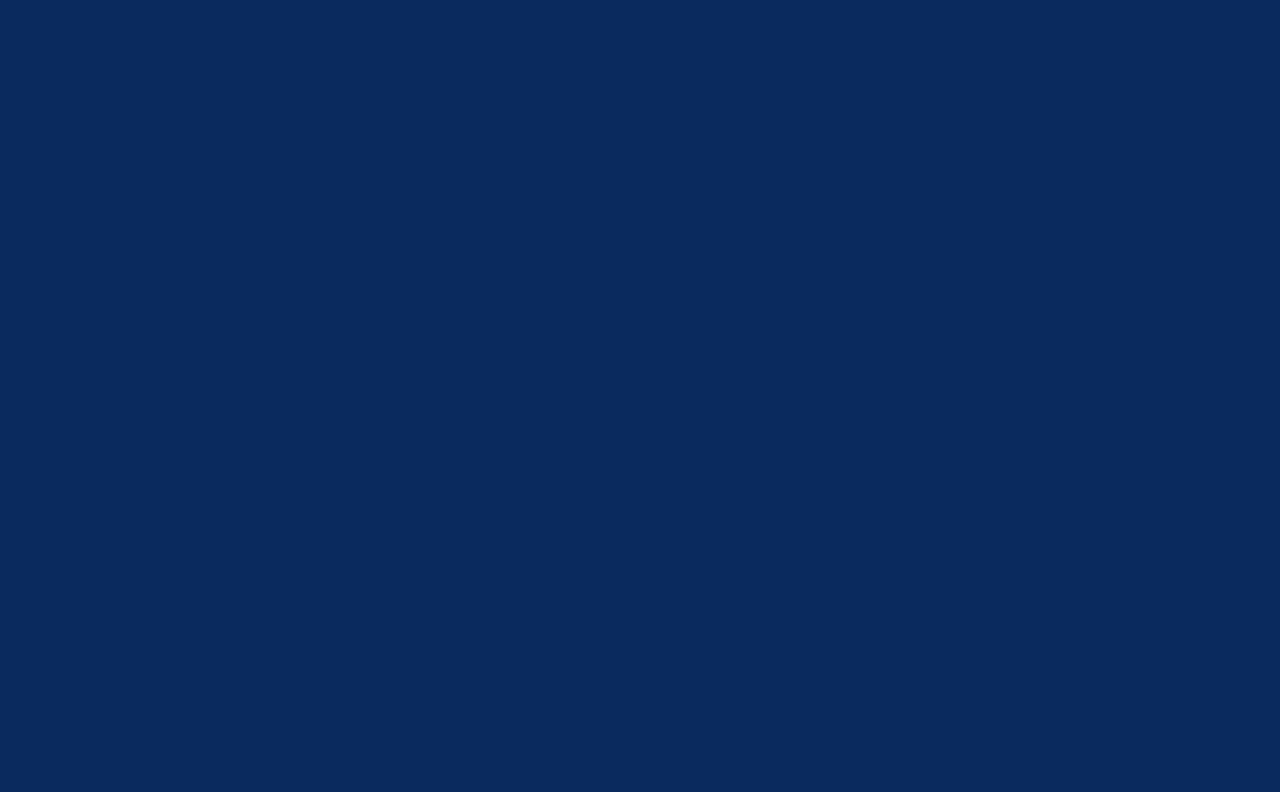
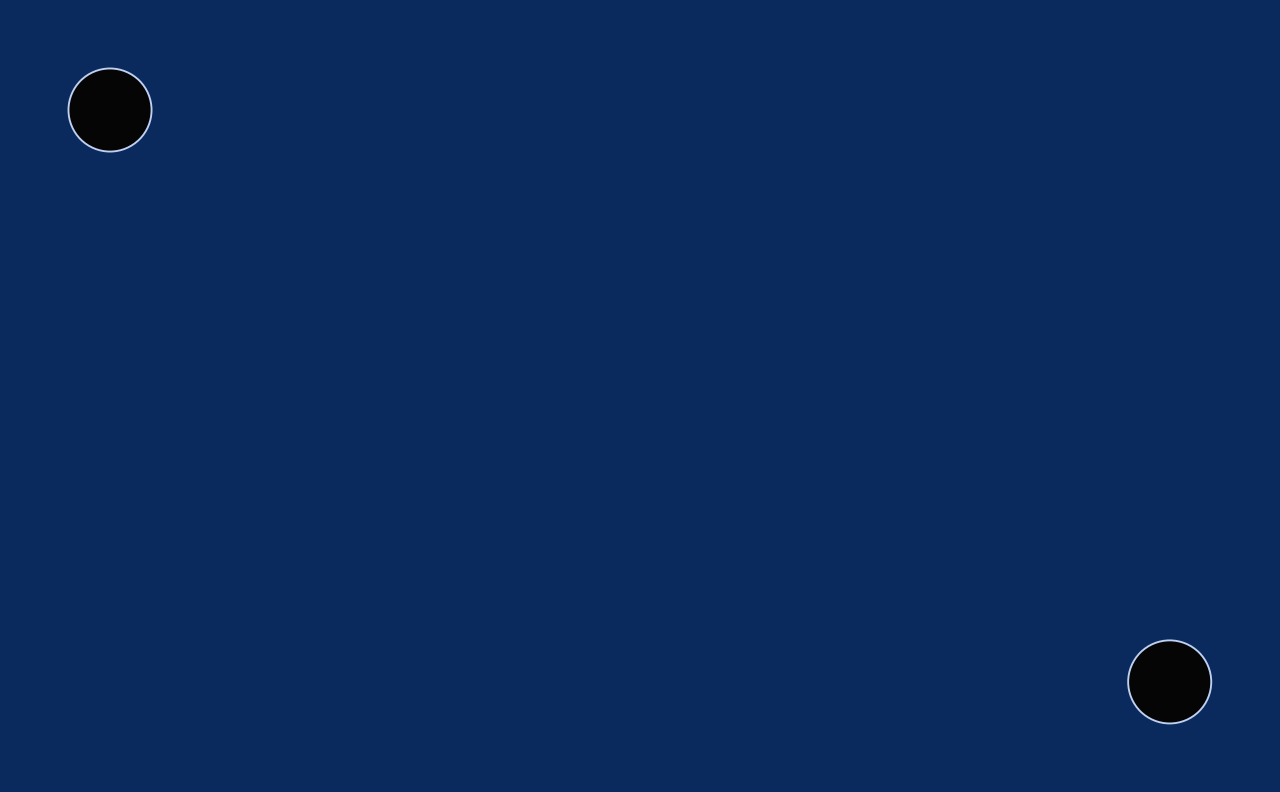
part: none -> (110, 110)
part: none -> (1169, 681)

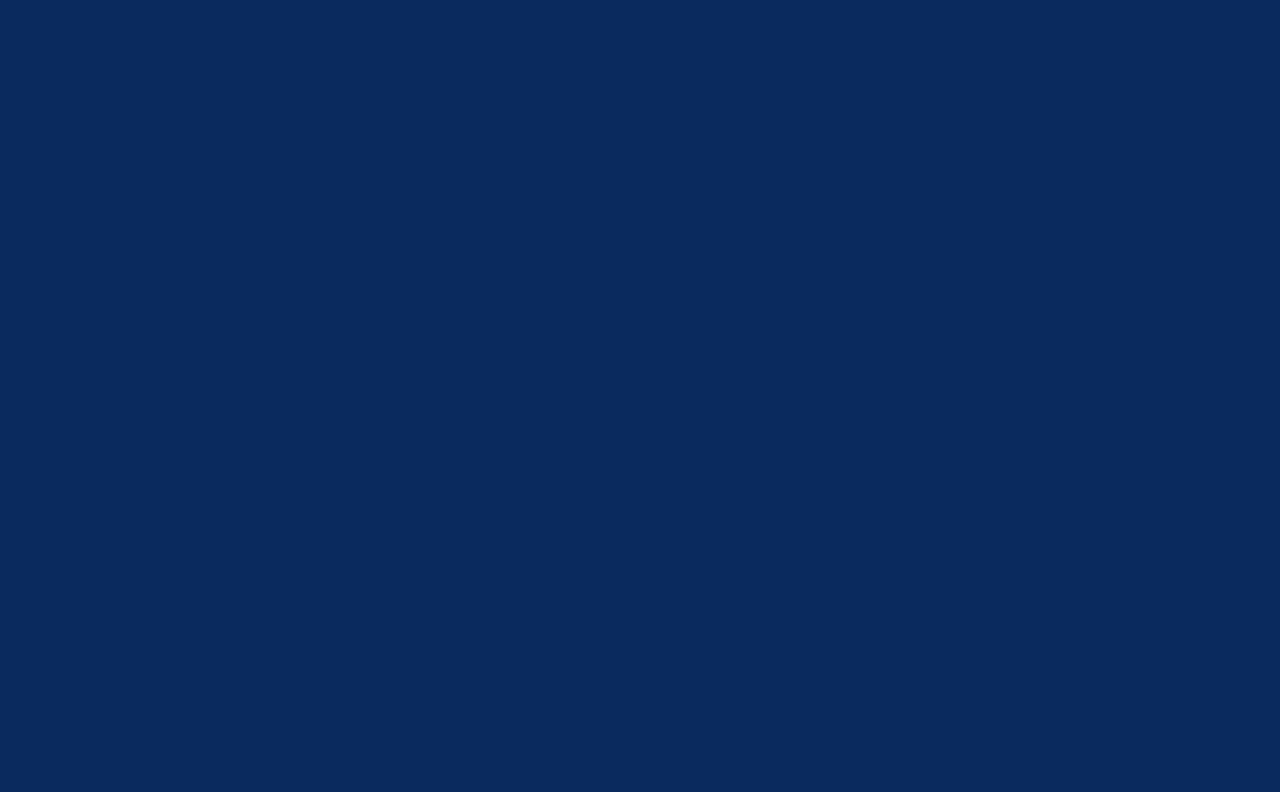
part: (110, 110) -> none
part: (1169, 681) -> none

